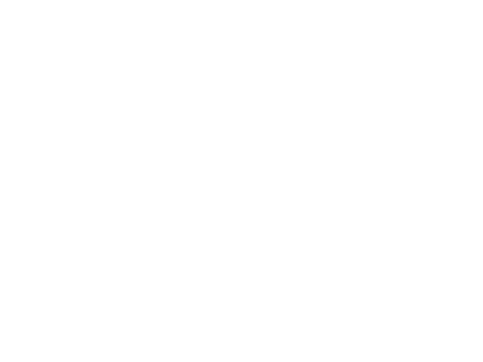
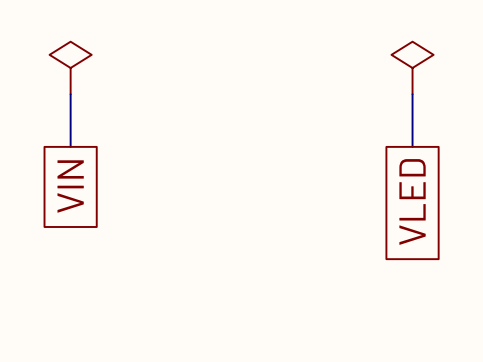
power symbol: none -> (70, 68)
power symbol: none -> (412, 68)
wire: none -> (70, 94) (70, 146)
wire: none -> (412, 94) (412, 146)
global label: none -> VIN (70, 186)
global label: none -> VLED (412, 201)

